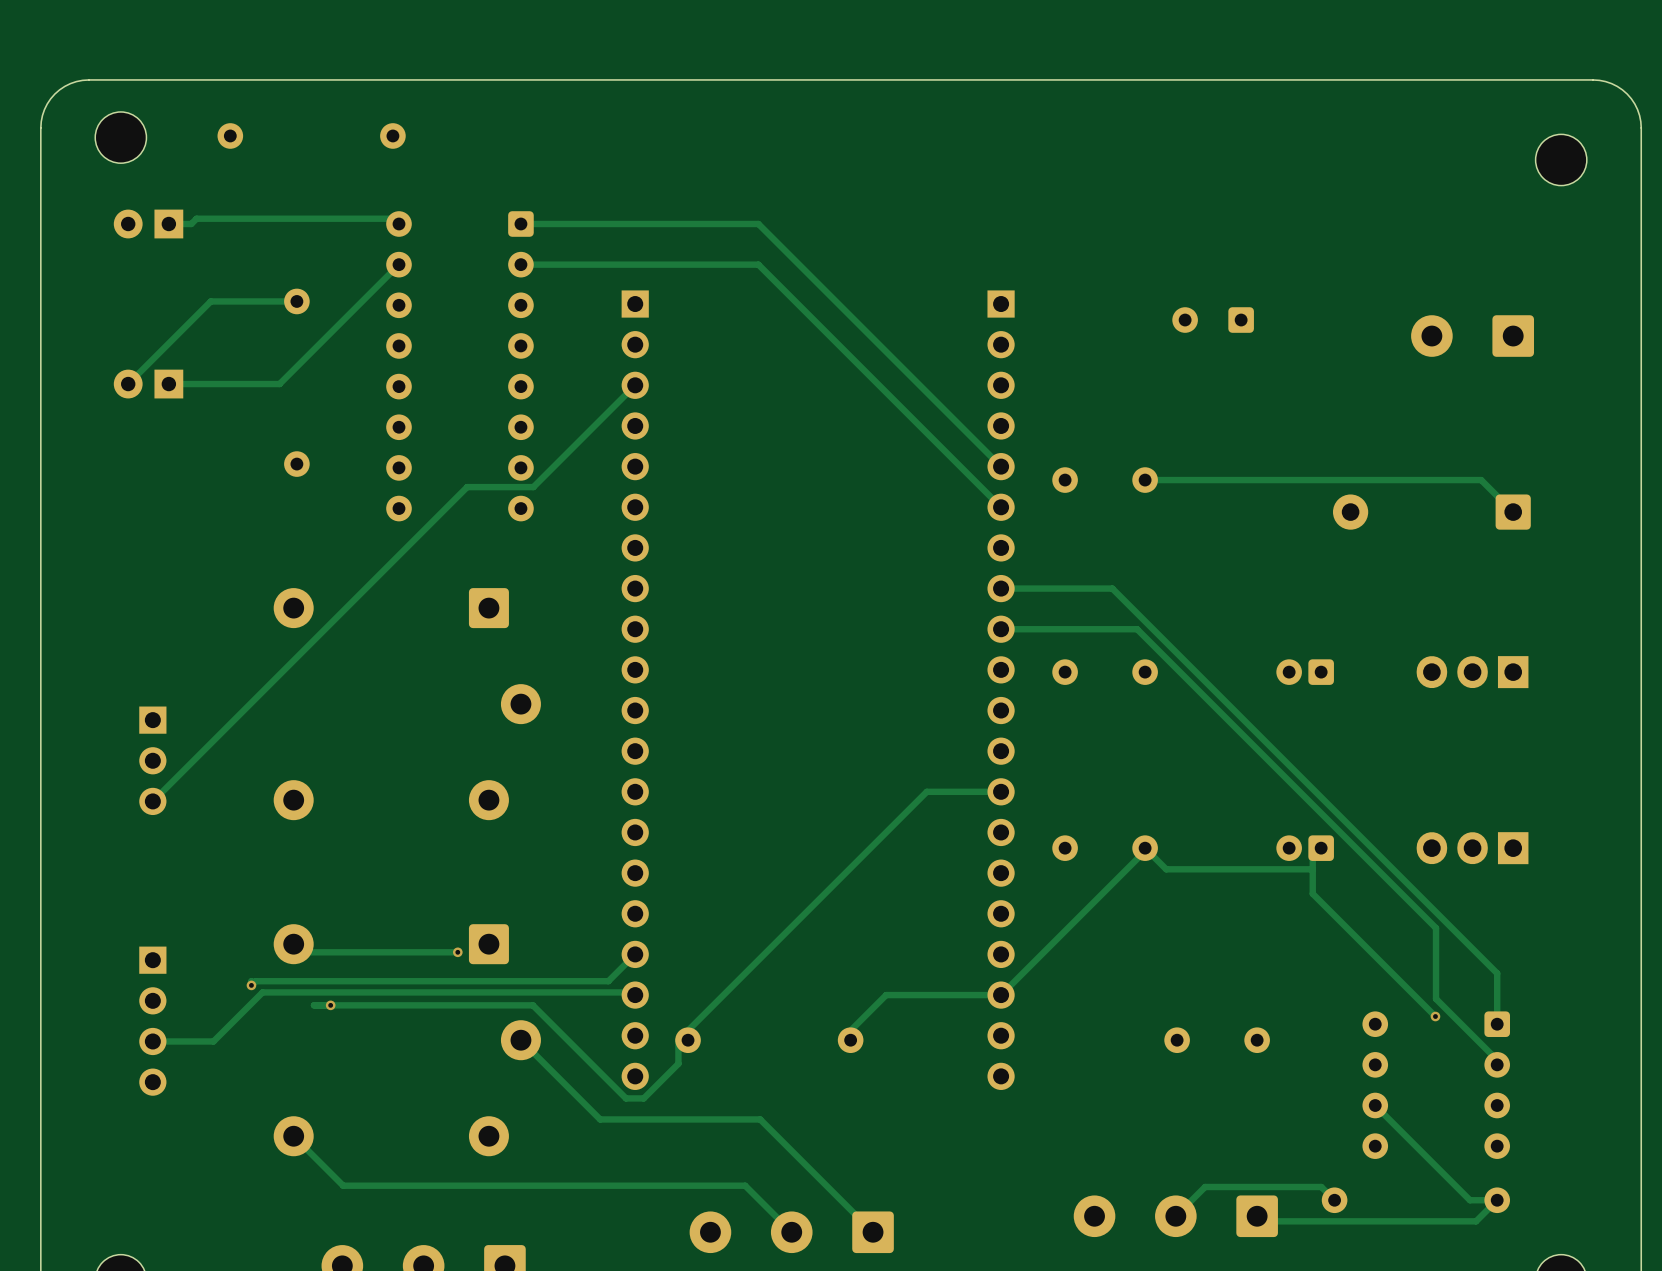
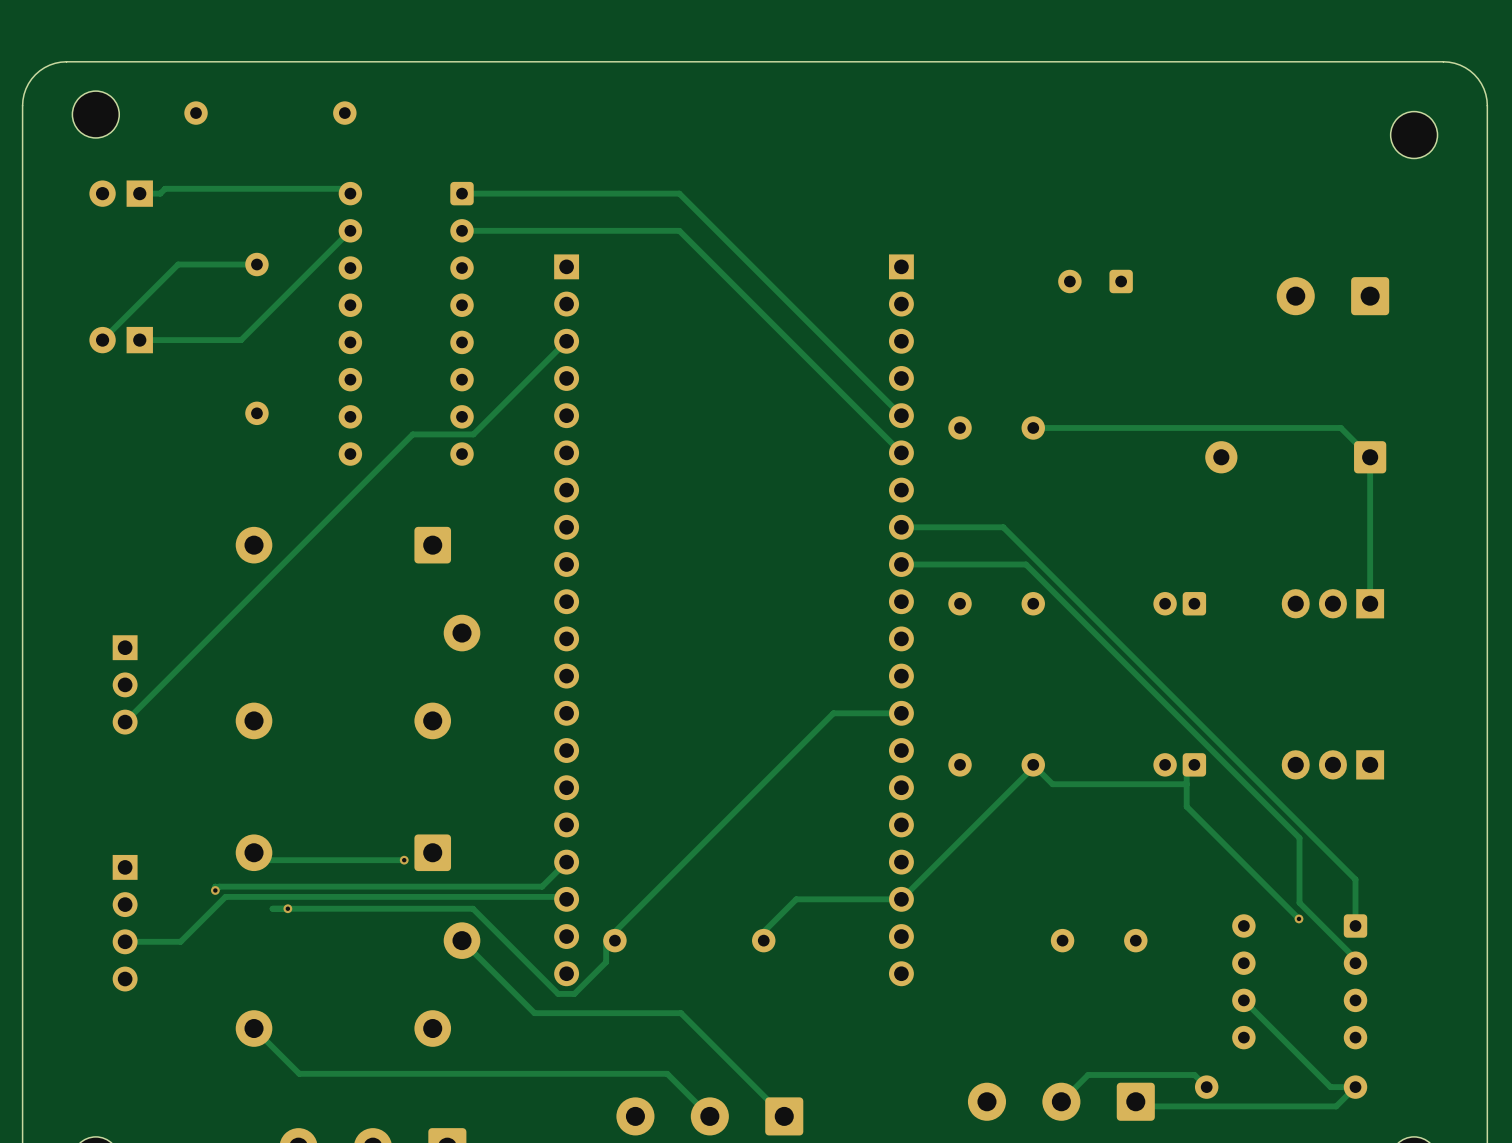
track: none -> (1370, 457) (1370, 603)

